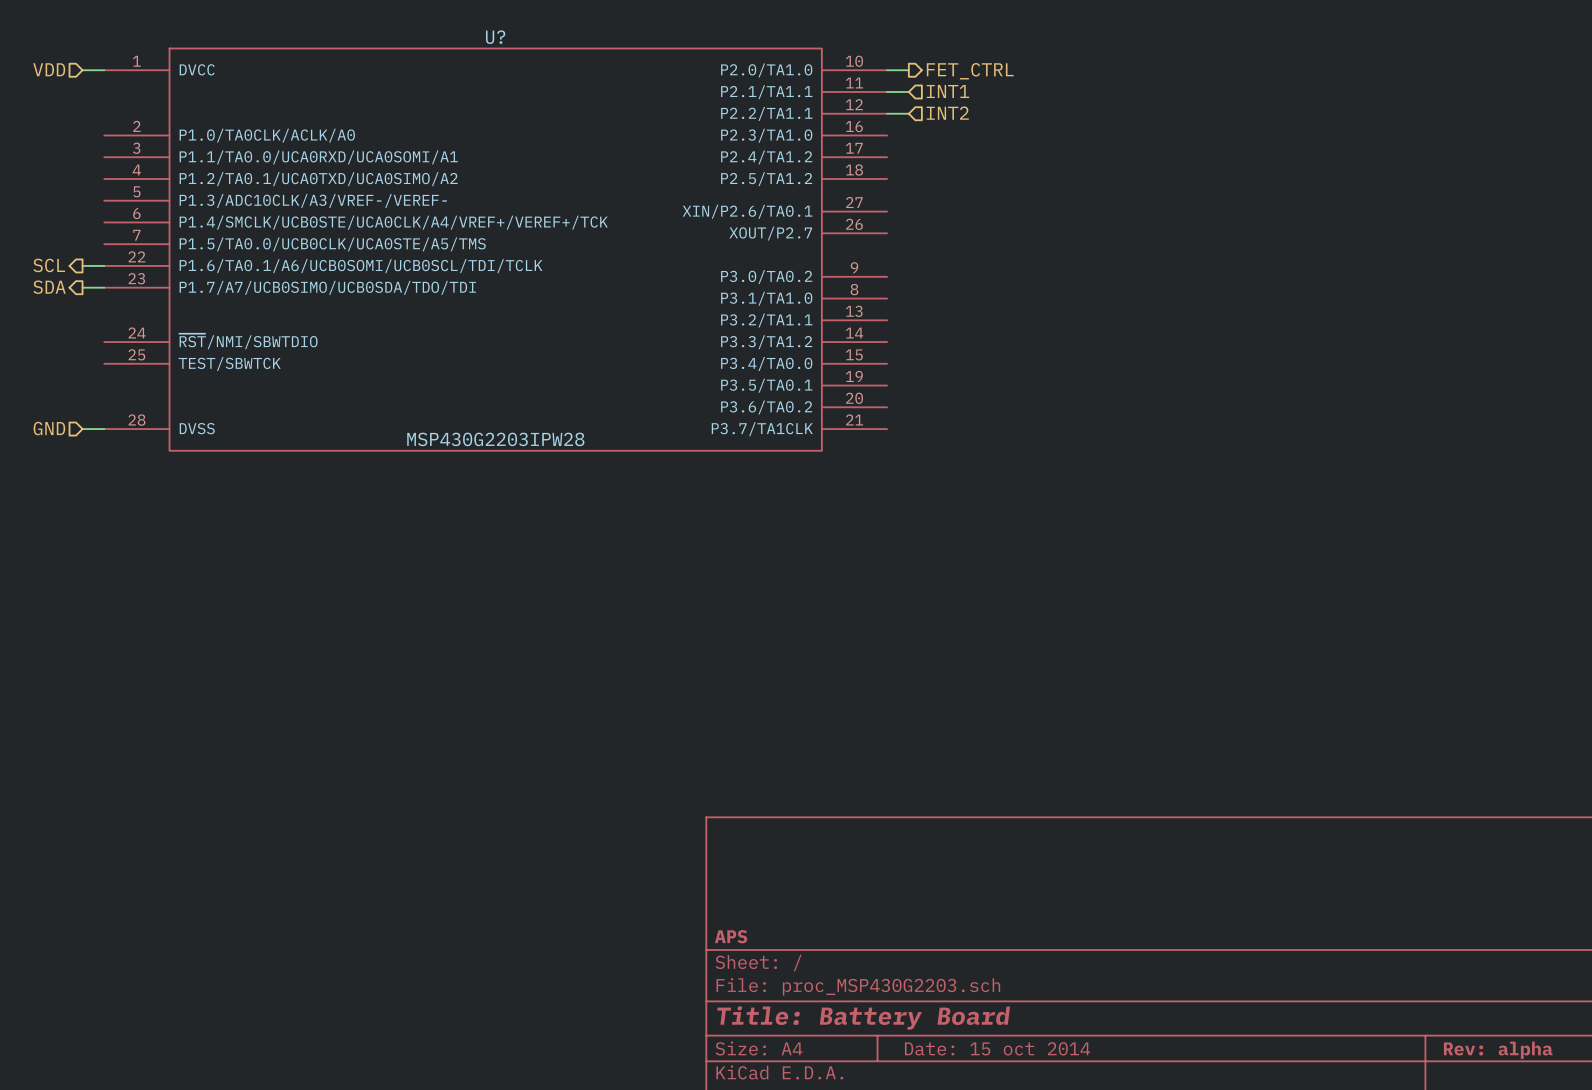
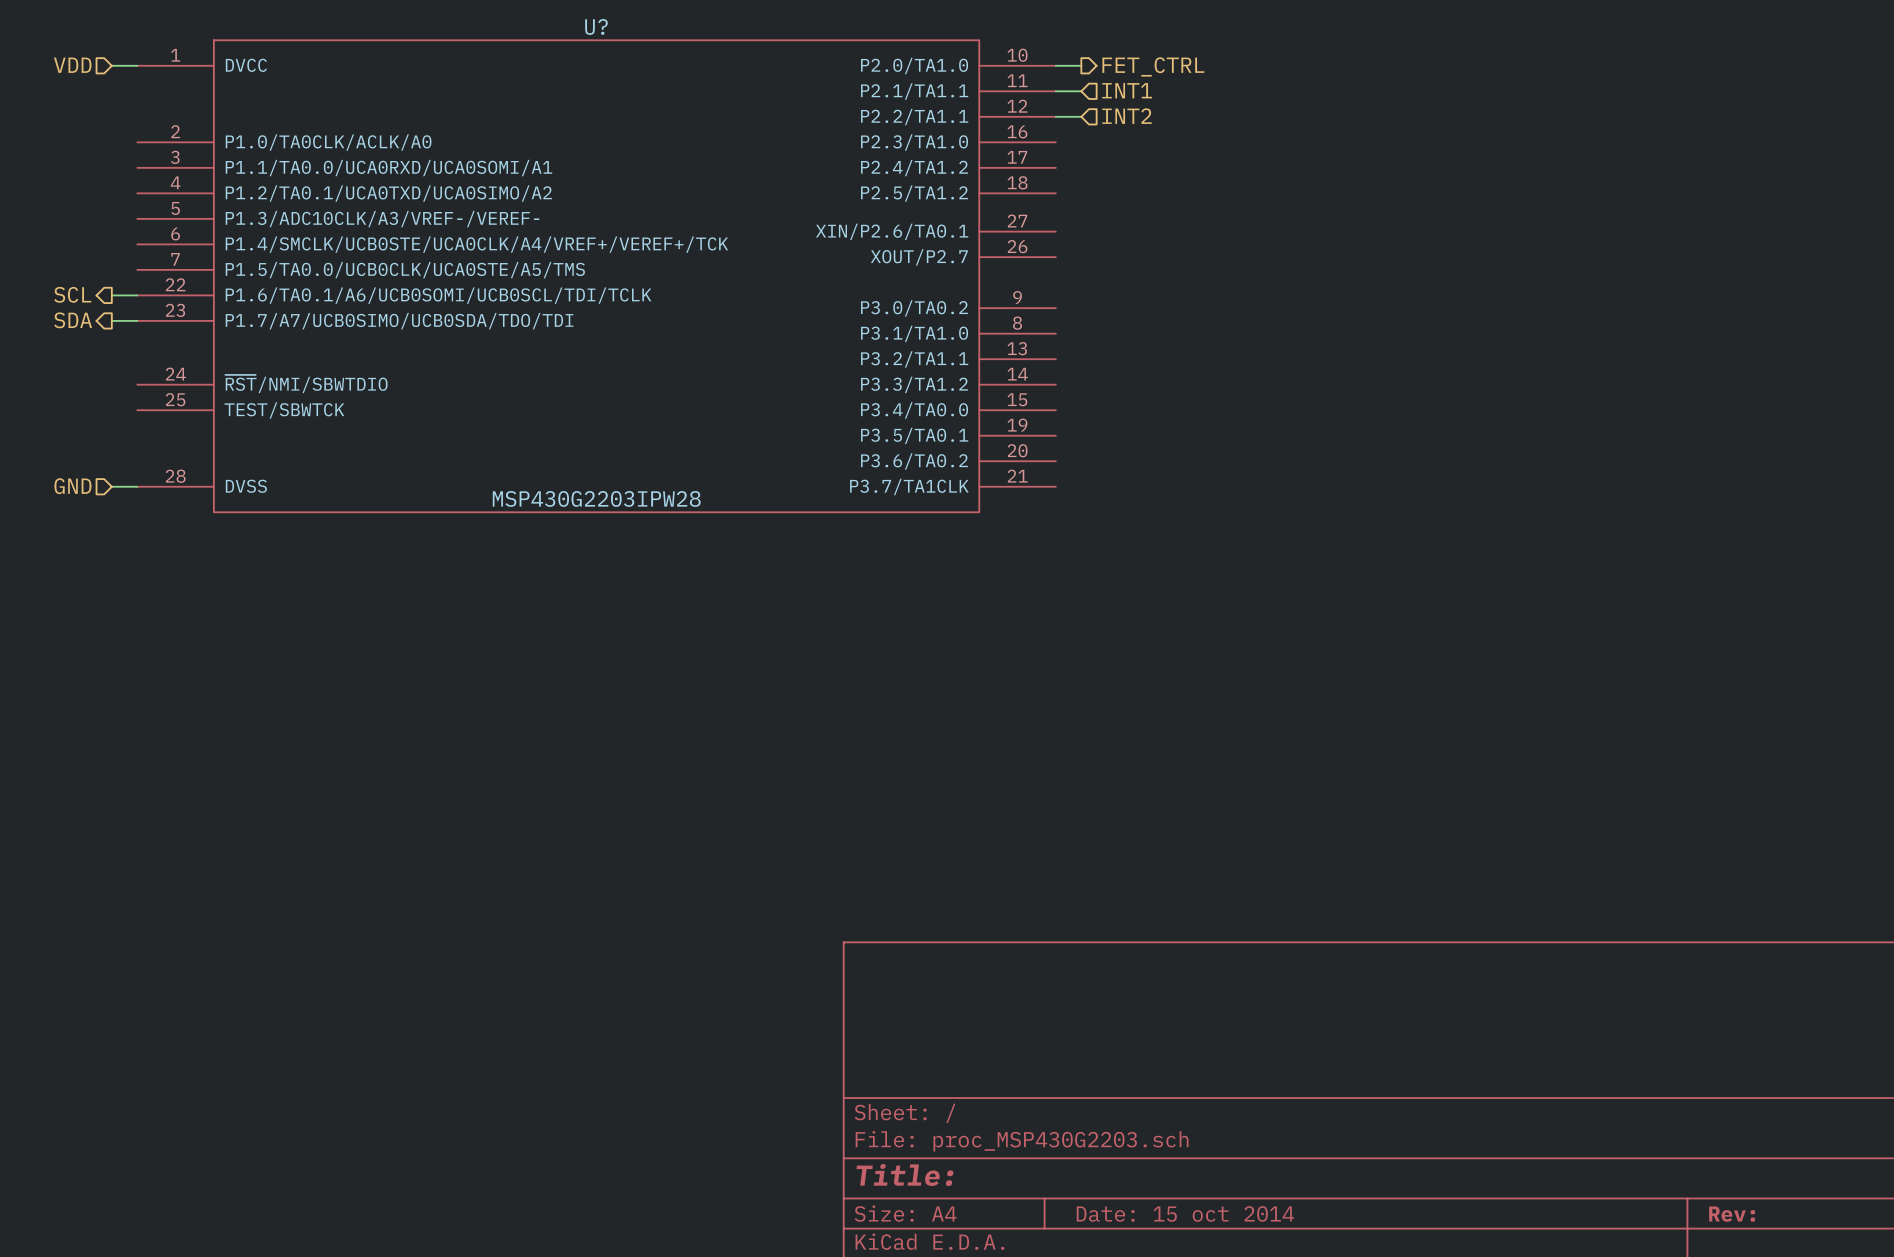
title block: APS (731, 936) -> none
title block: Title: Battery Board (863, 1017) -> Title: (904, 1175)
title block: Rev: alpha (1498, 1050) -> Rev: (1732, 1214)

